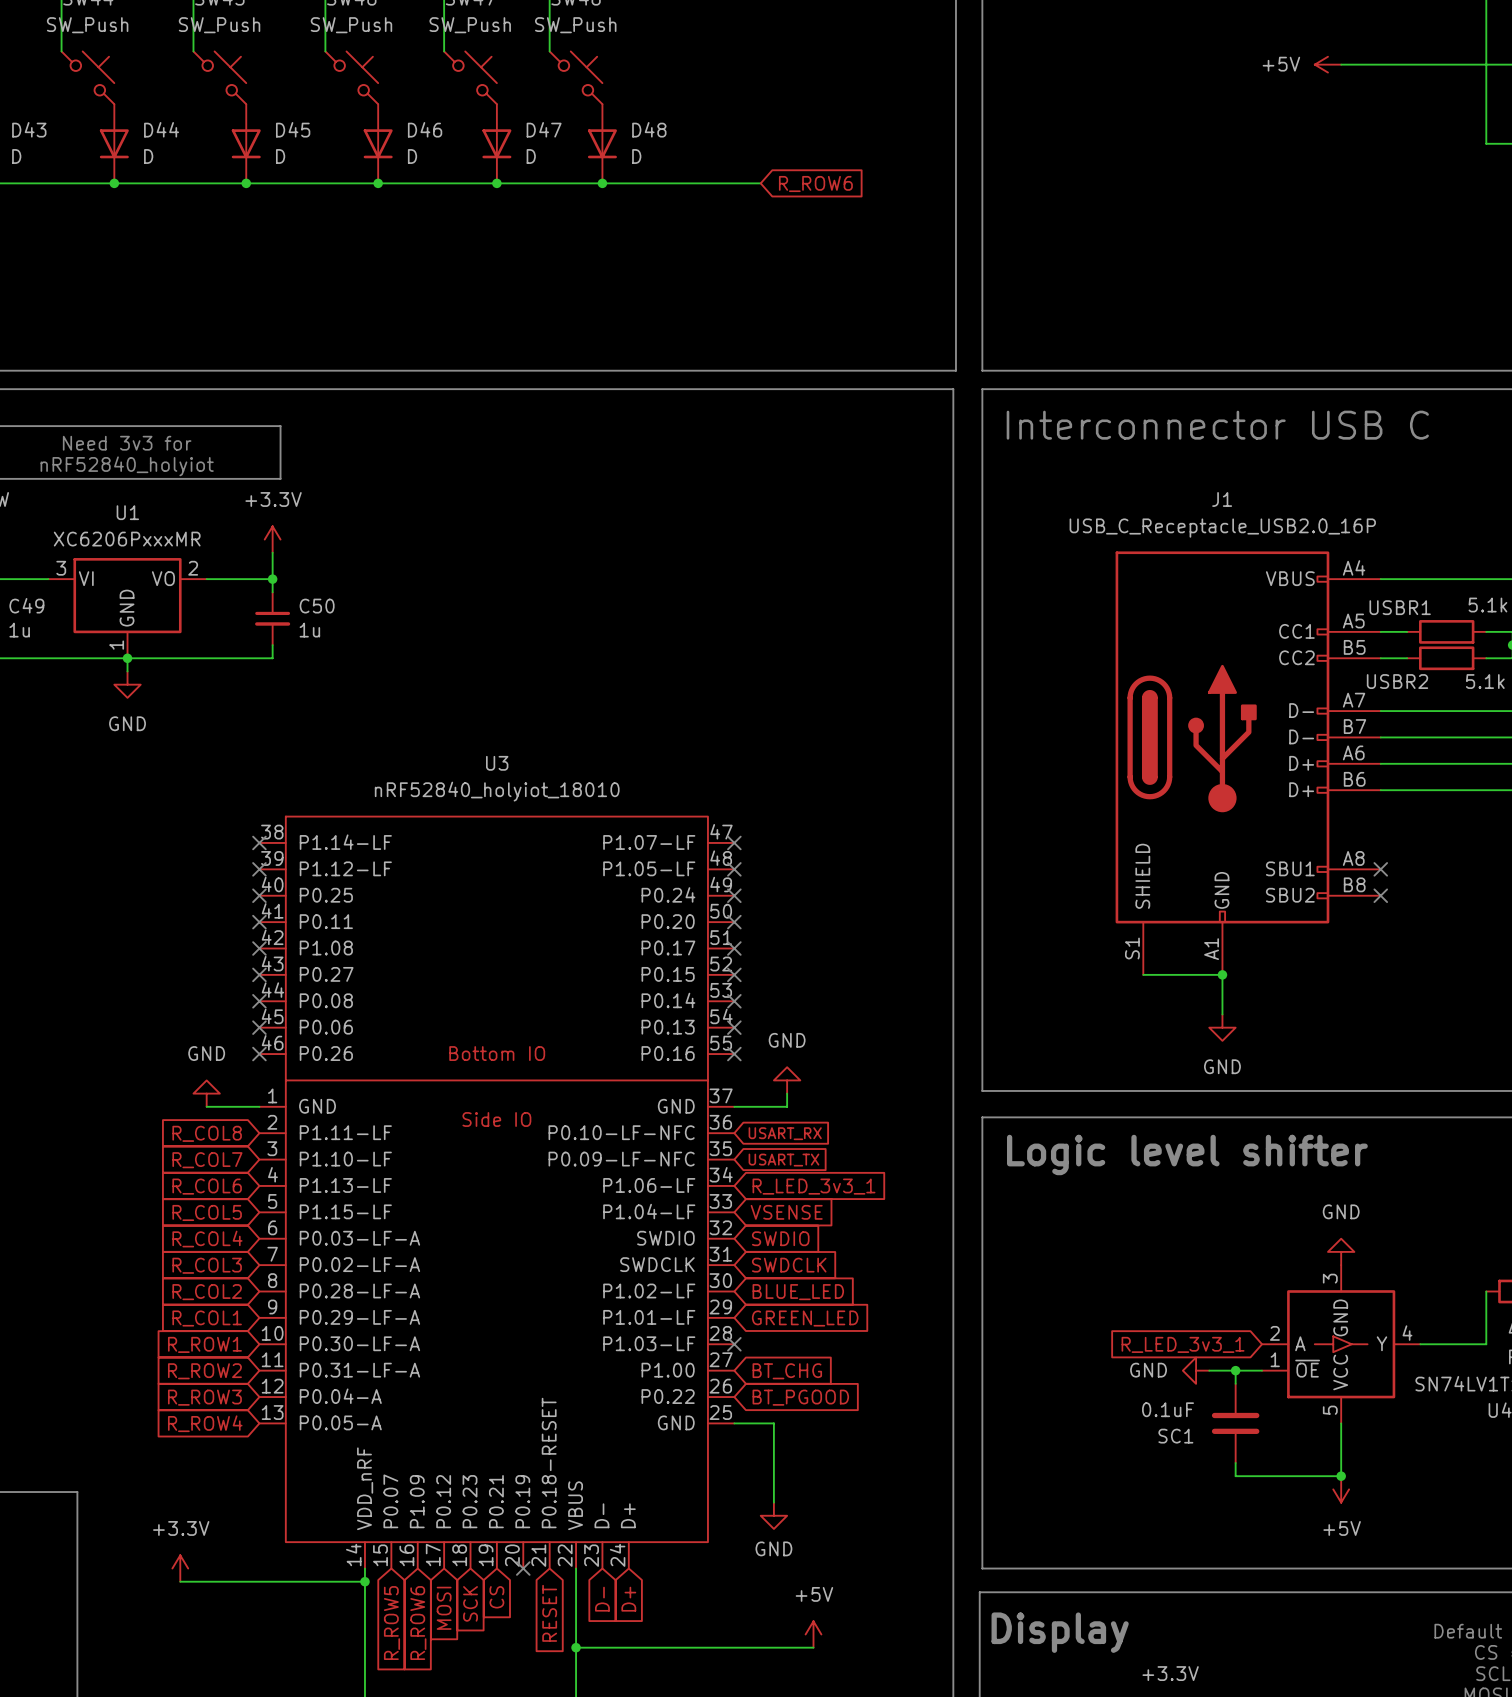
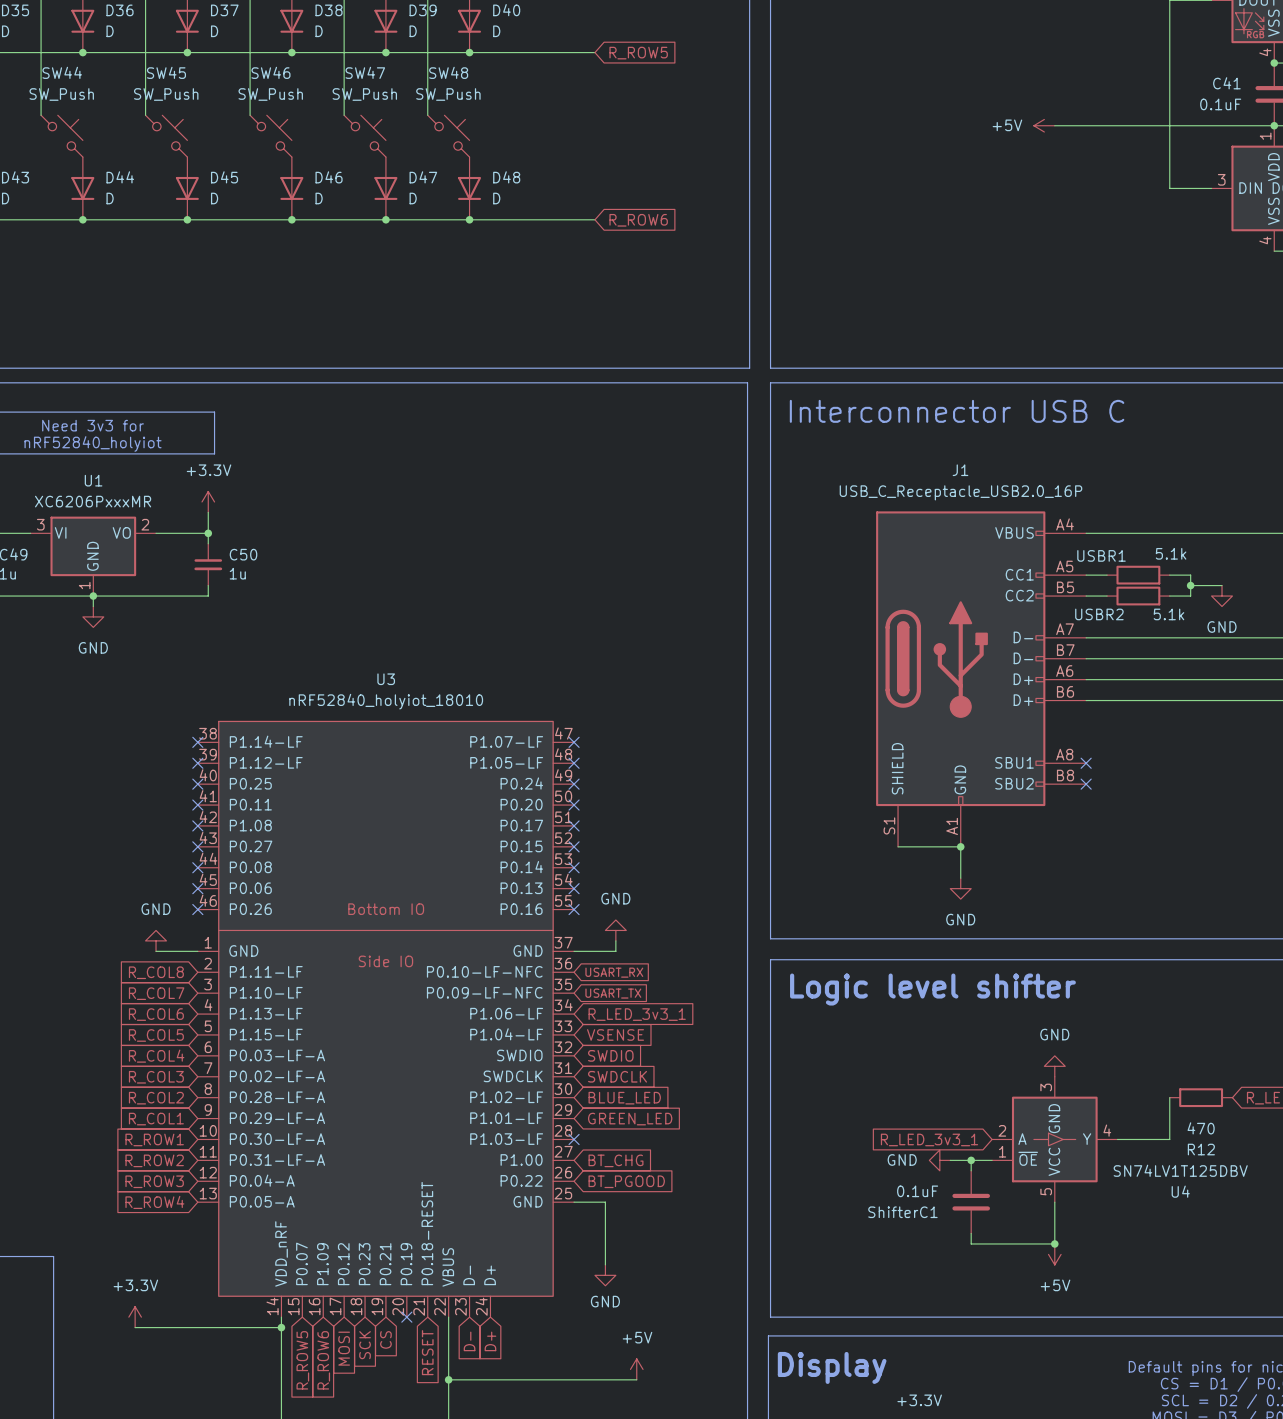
SC1 name: SC1 (1175, 1436) -> ShifterC1 (902, 1212)

